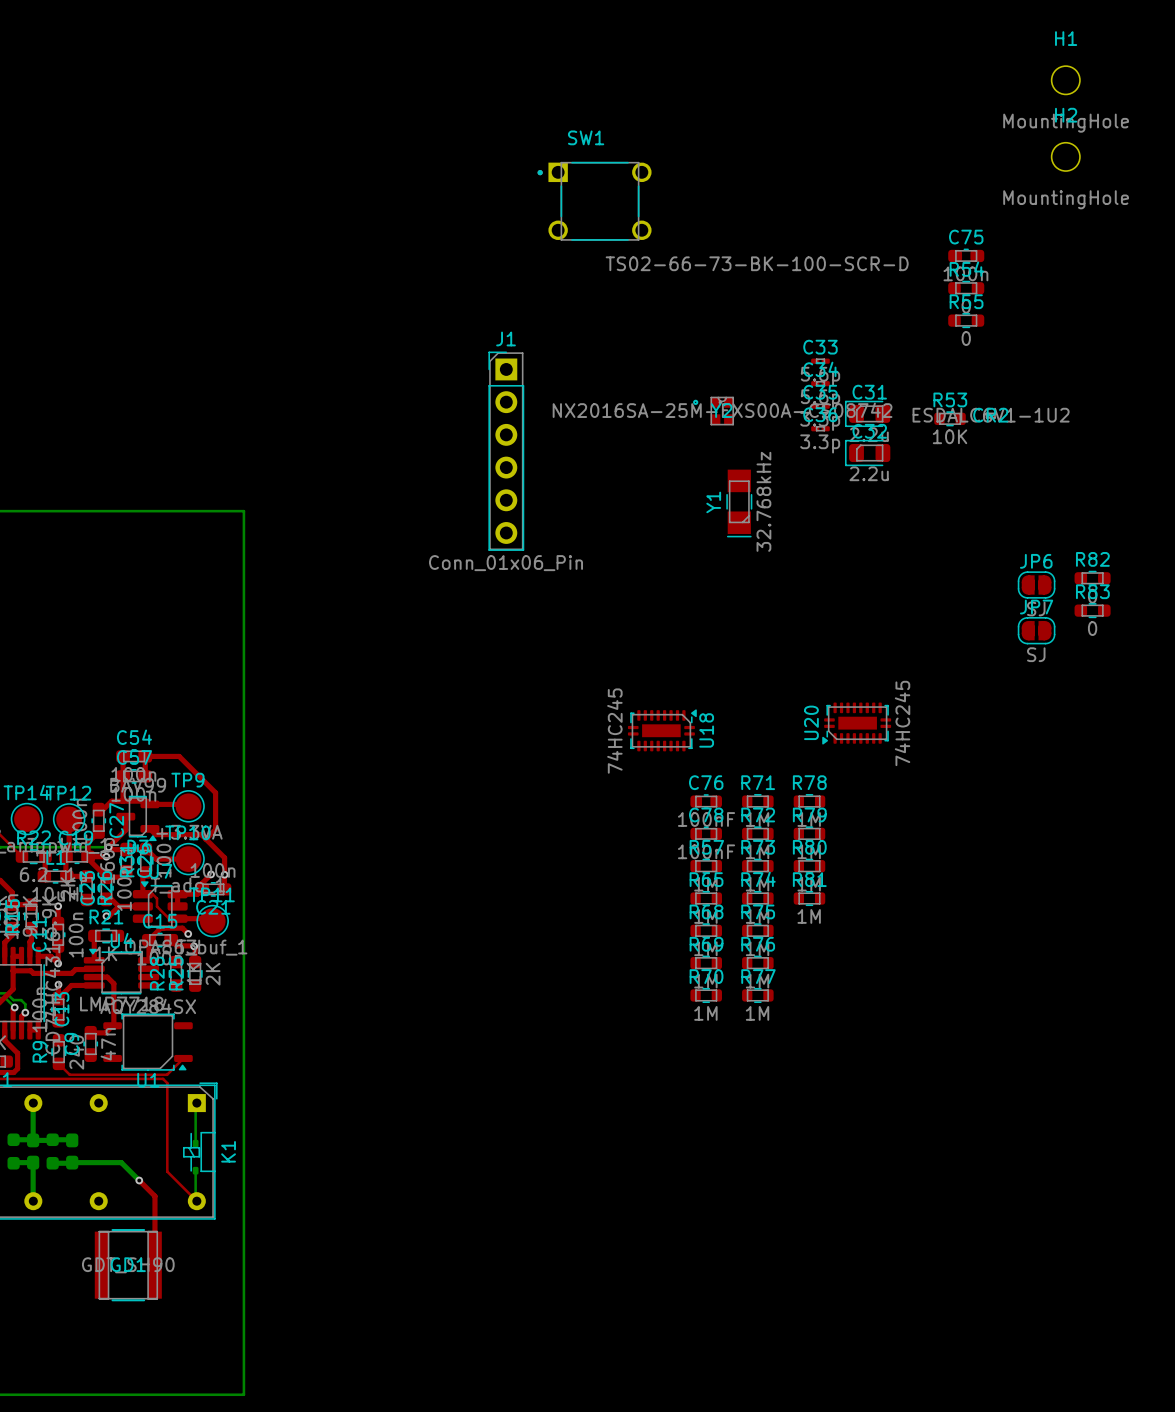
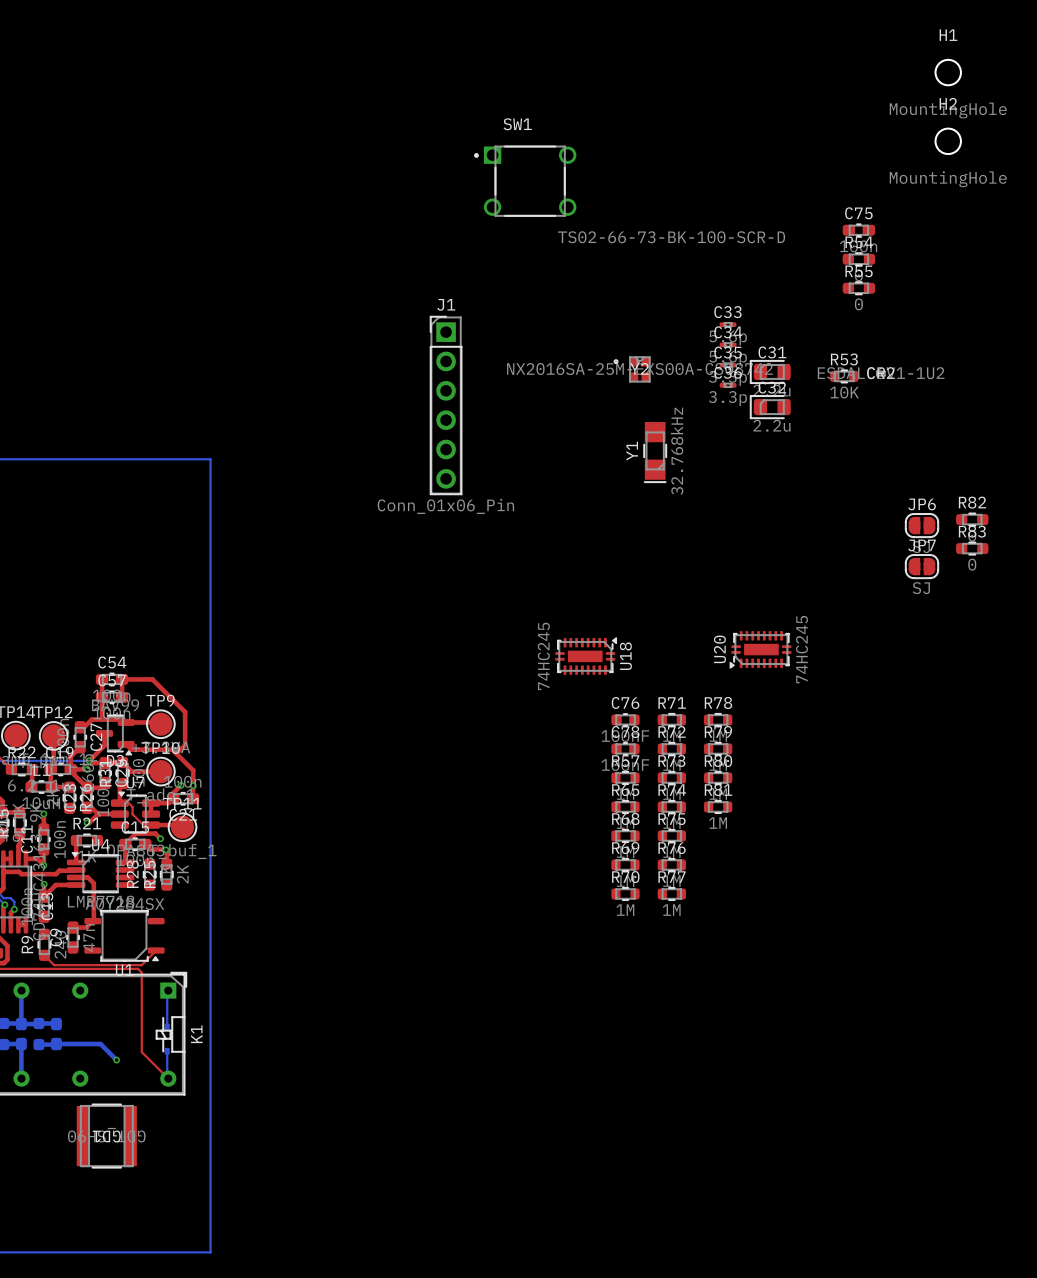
top track: (139, 1180) (154, 1196) (154, 1265) -> none
GD1 rotation: 0° (128, 1265) -> 180° (106, 1136)

